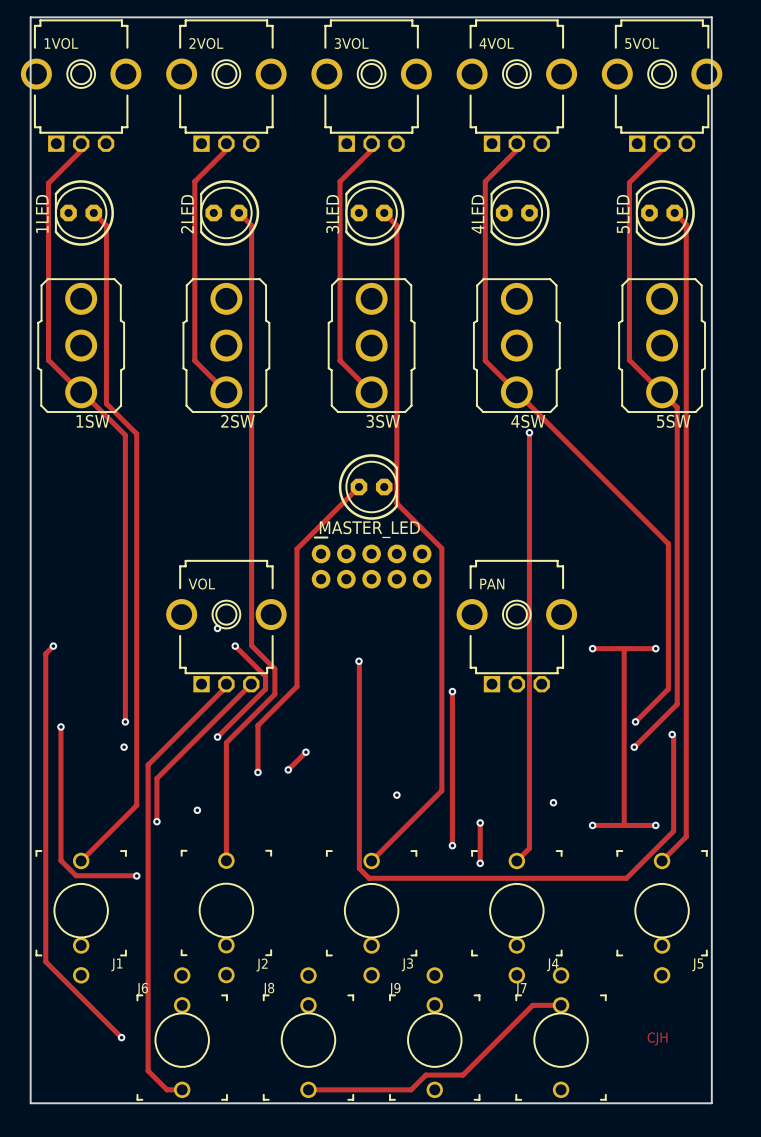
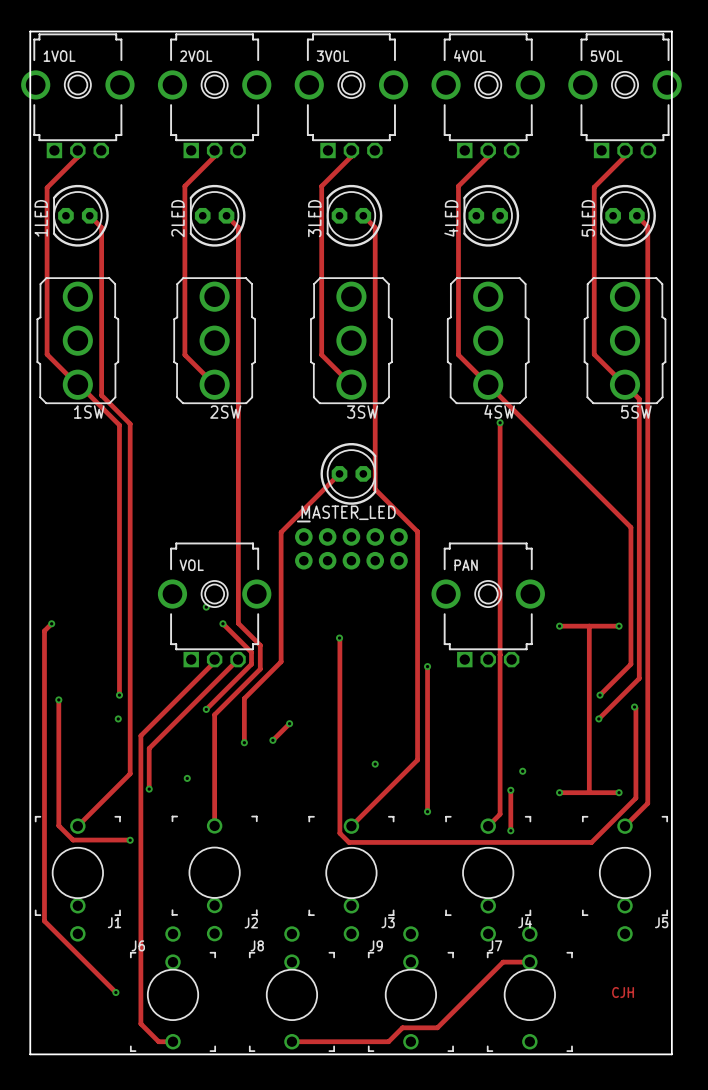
track: (480, 822) (480, 863) -> none
via: (480, 822) -> none
track: none -> (510, 790) (510, 830)
via: none -> (510, 790)
via: (480, 863) -> none
via: none -> (510, 830)

